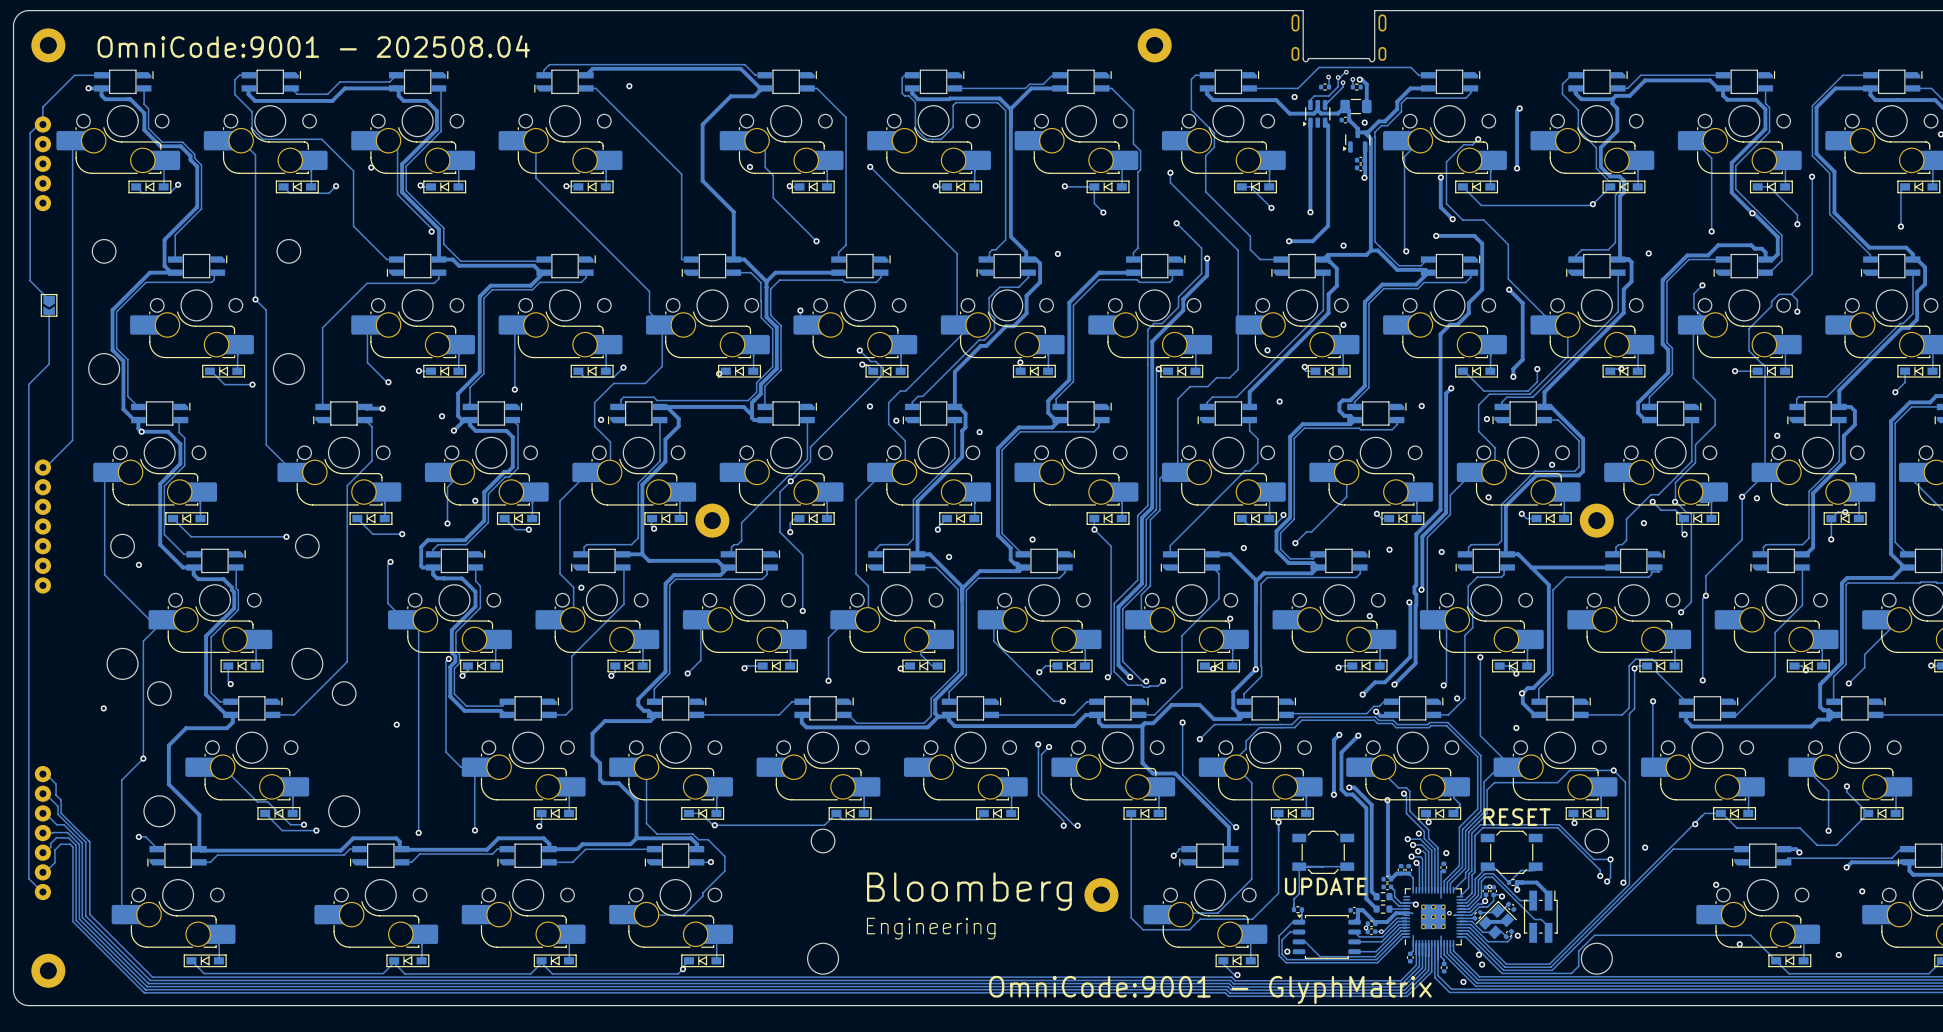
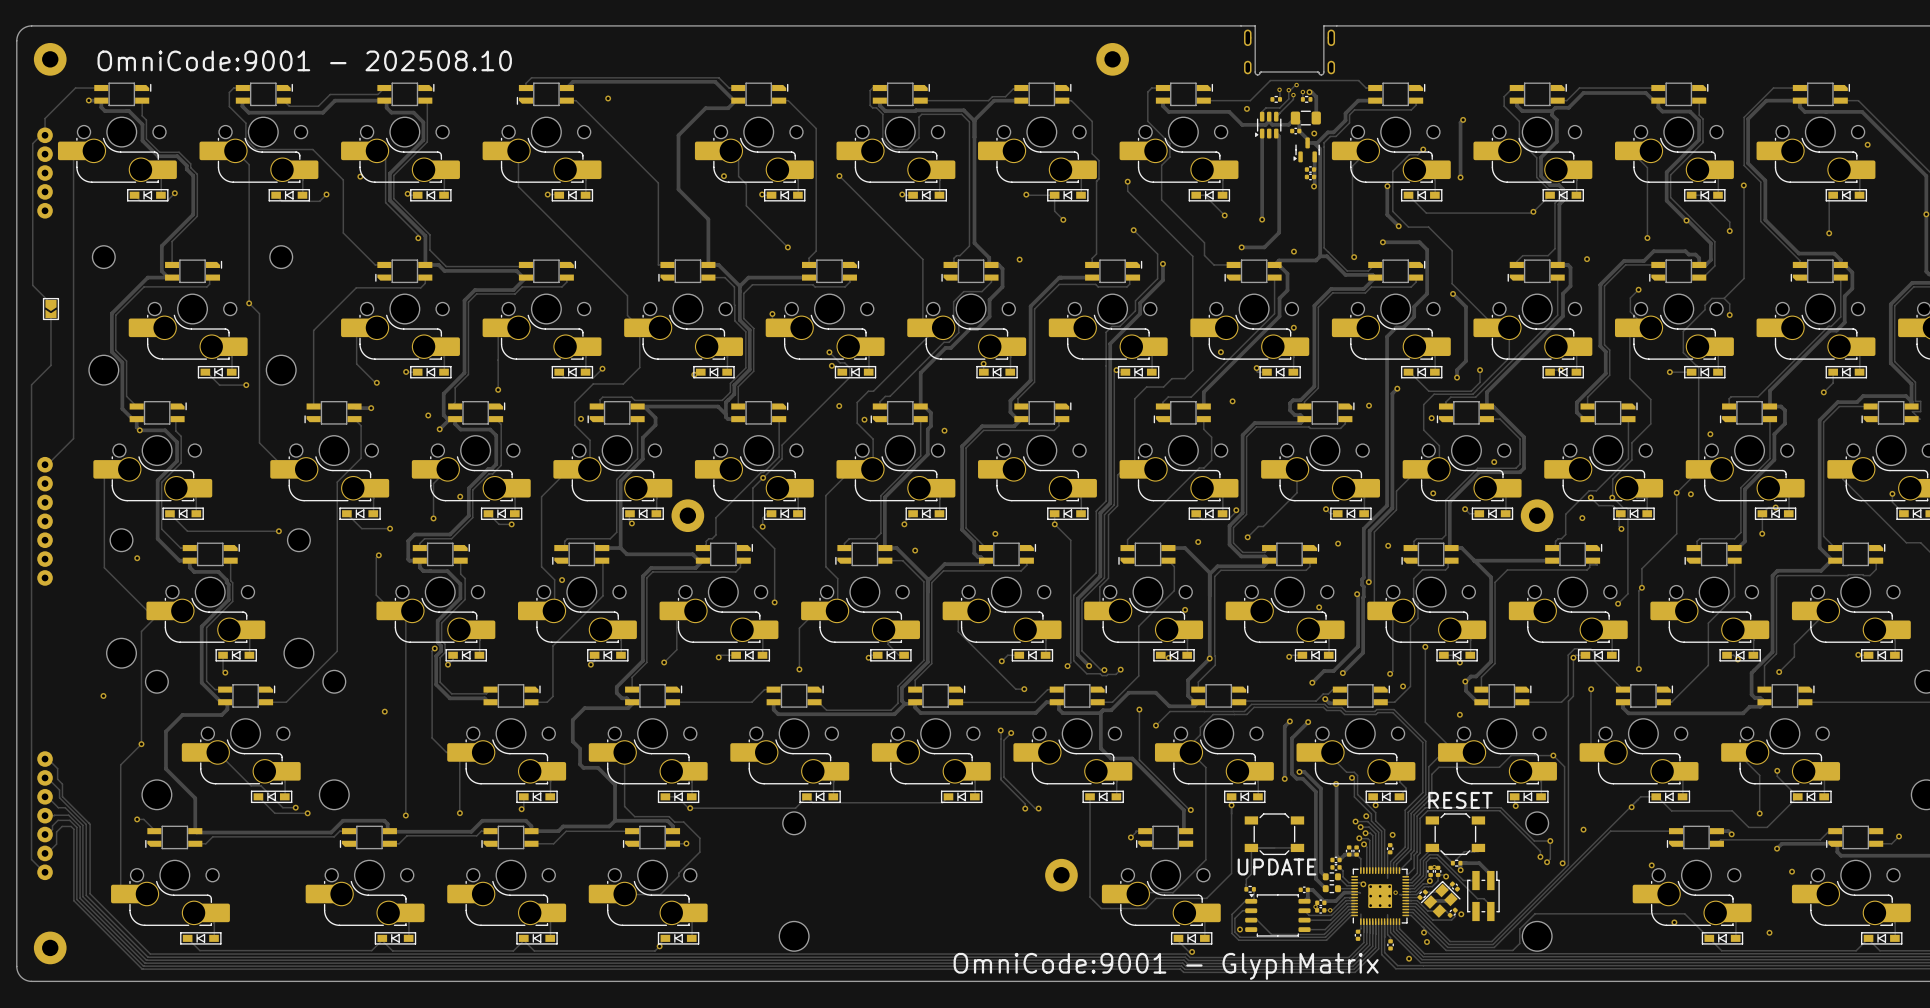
text: OmniCode:9001 - 202508.04 (313, 46) -> OmniCode:9001 - 202508.10 (304, 60)
text: Bloomberg (969, 891) -> none
text: Engineering (931, 928) -> none

